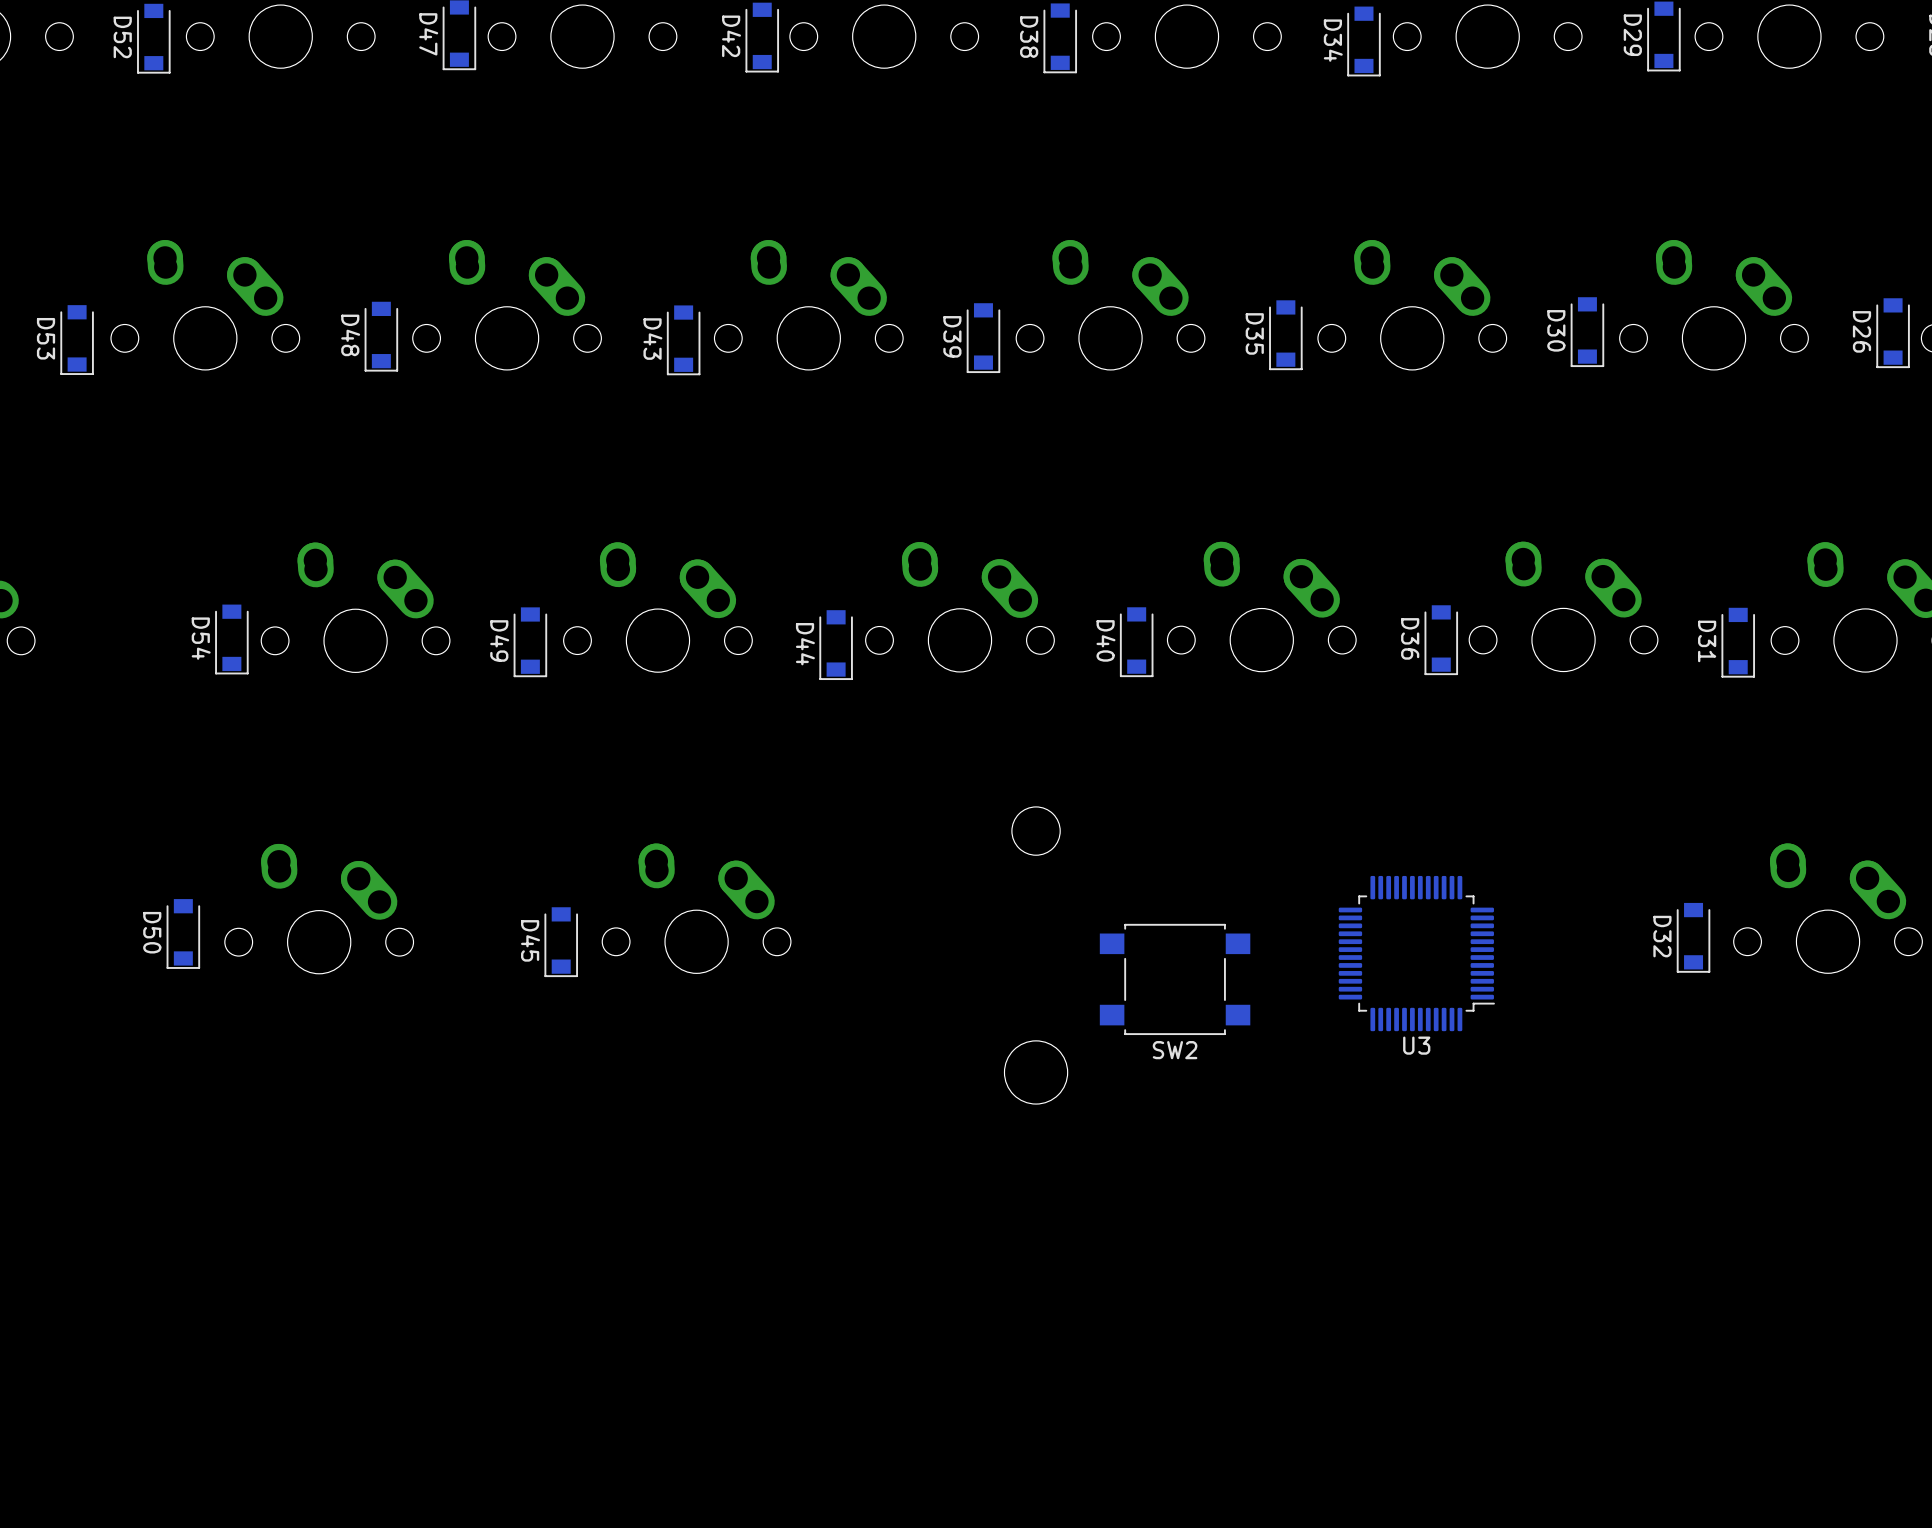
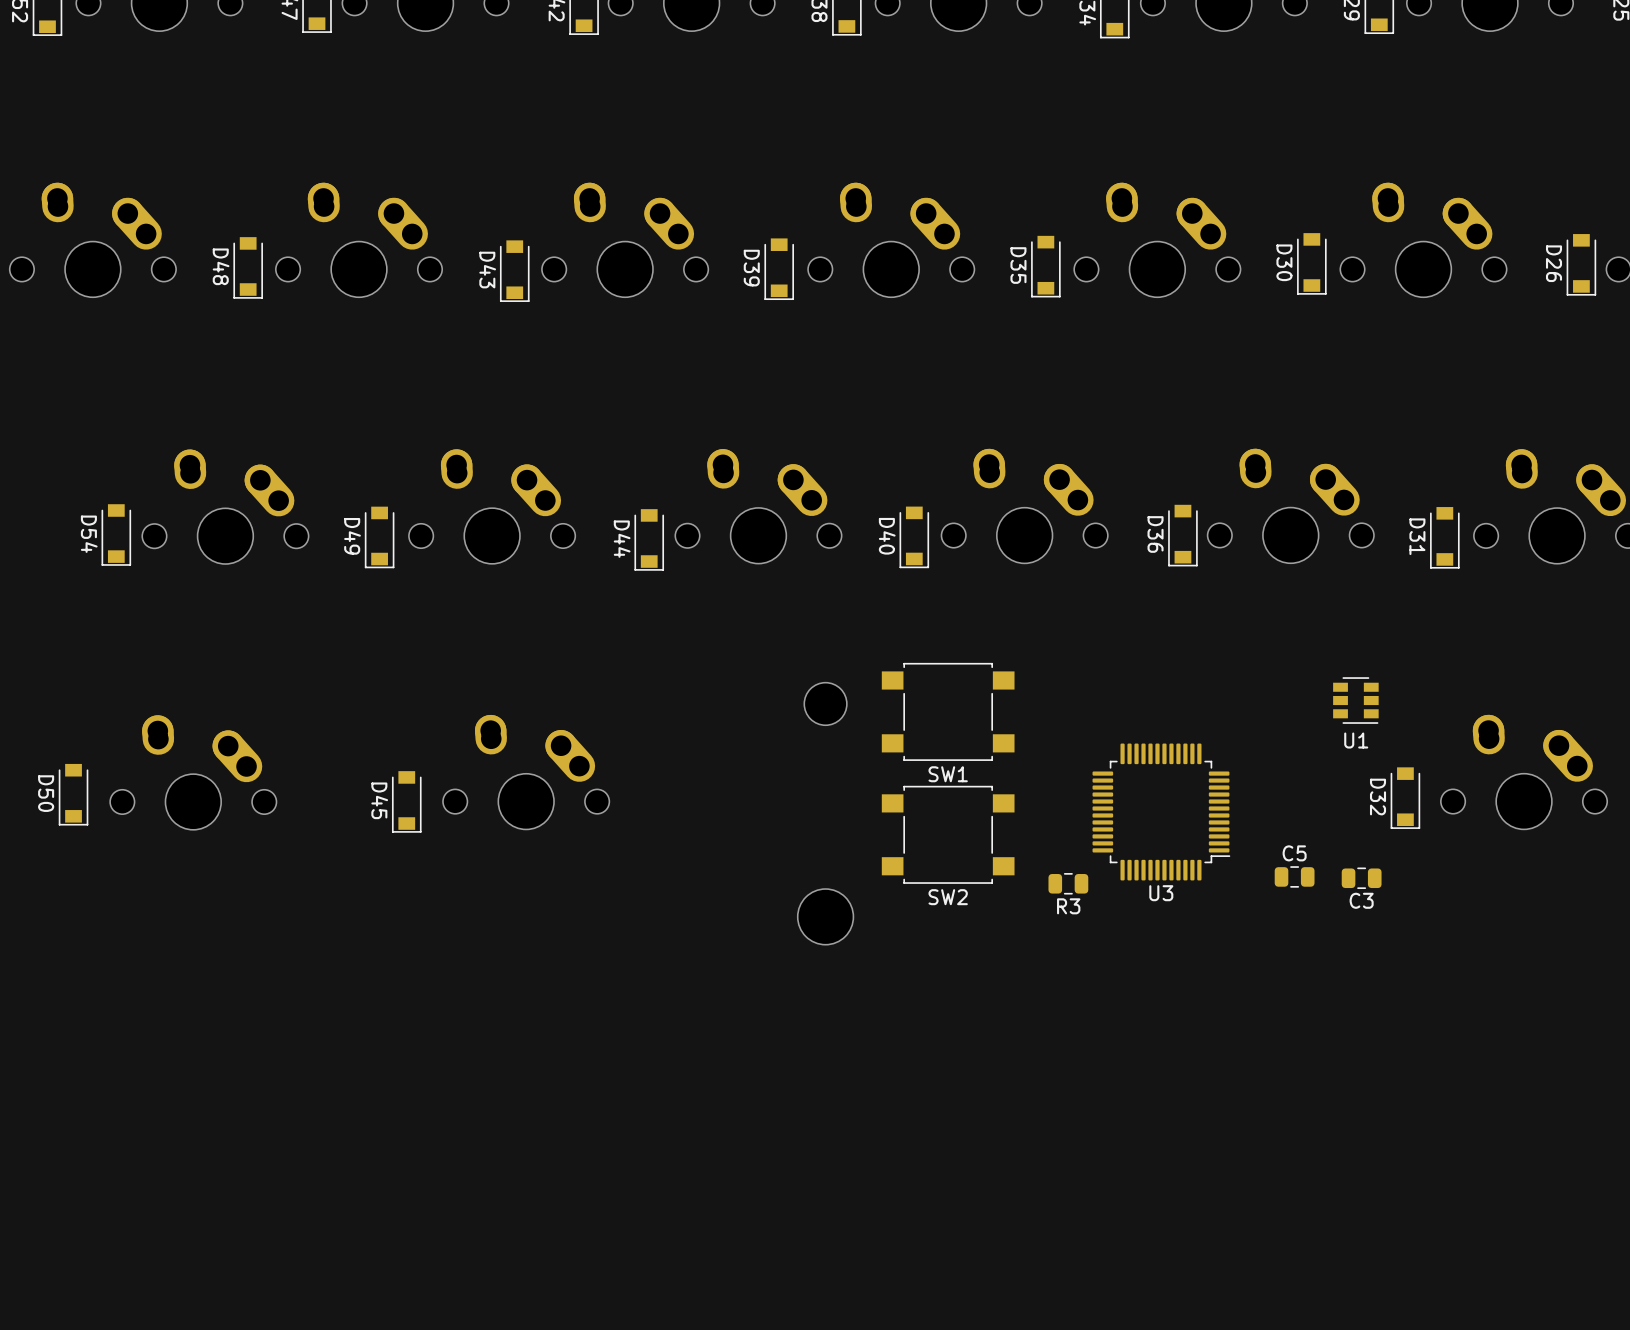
U1: none -> (1355, 700)
SW1: none -> (948, 711)
C5: none -> (1294, 876)
C3: none -> (1361, 878)
R3: none -> (1068, 883)

